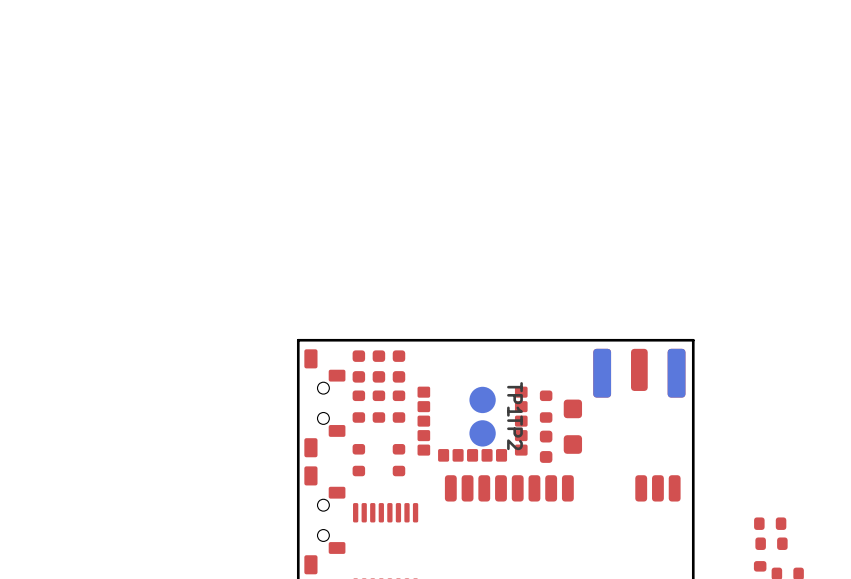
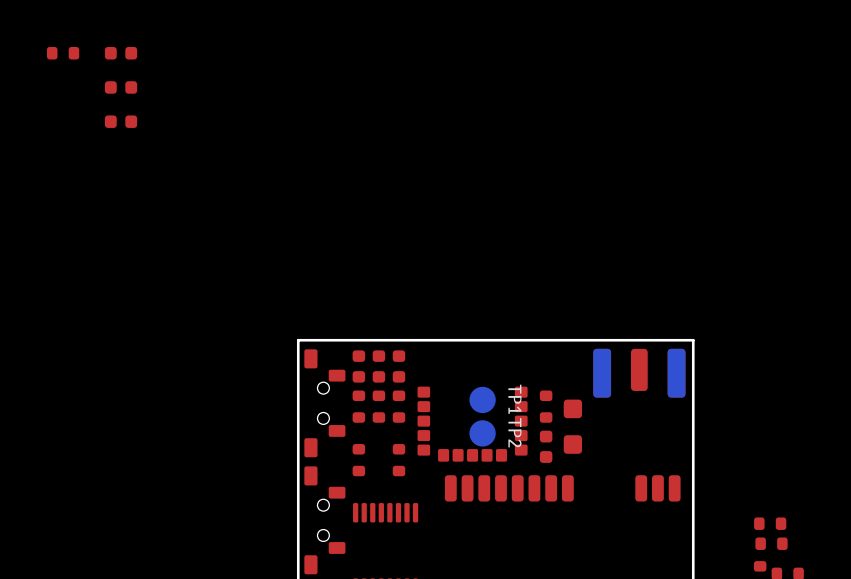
part: none -> (63, 53)
part: none -> (121, 53)
part: none -> (121, 87)
part: none -> (121, 121)

